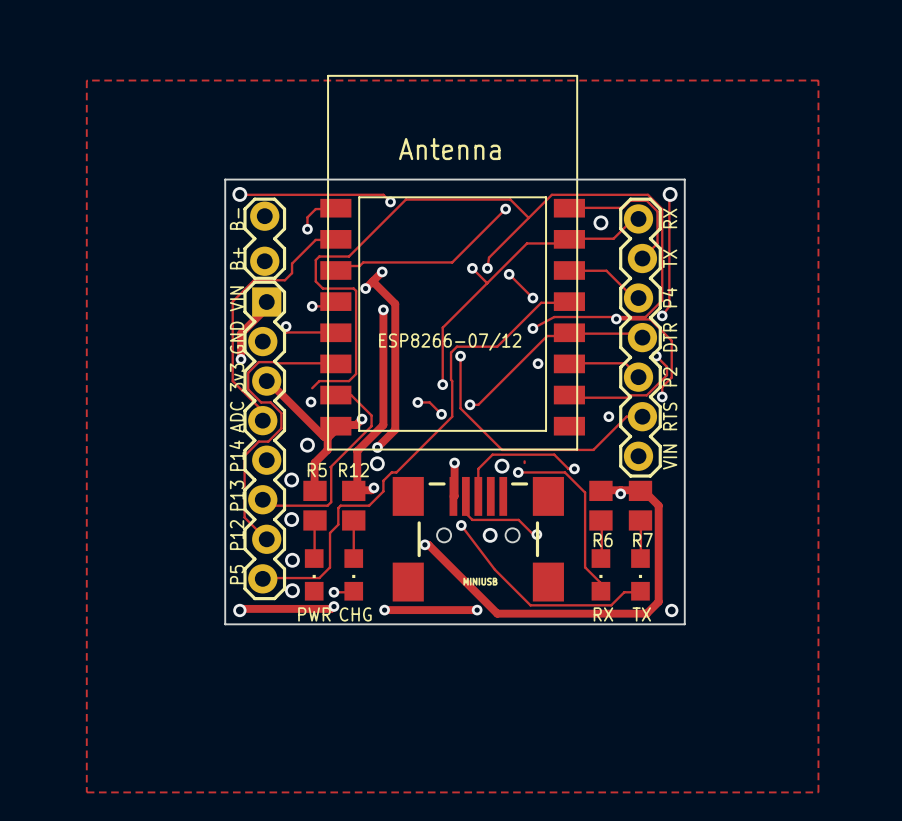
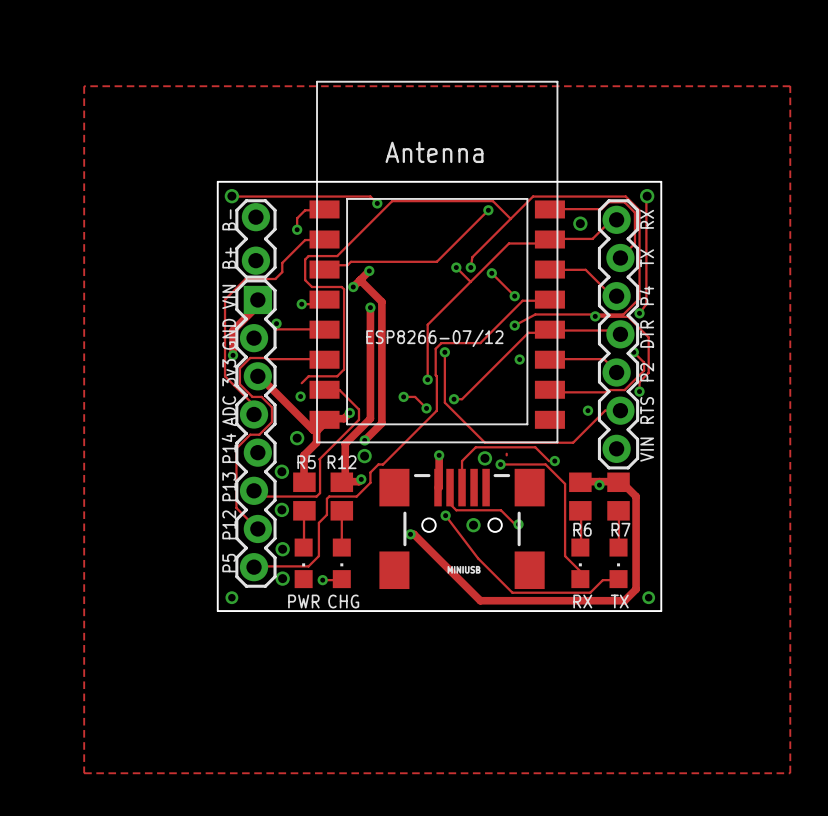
track: (333, 606) (331, 608) (239, 610) -> none
via: (333, 606) -> none
track: (384, 610) (477, 610) -> none
via: (384, 610) -> none
via: (477, 610) -> none

